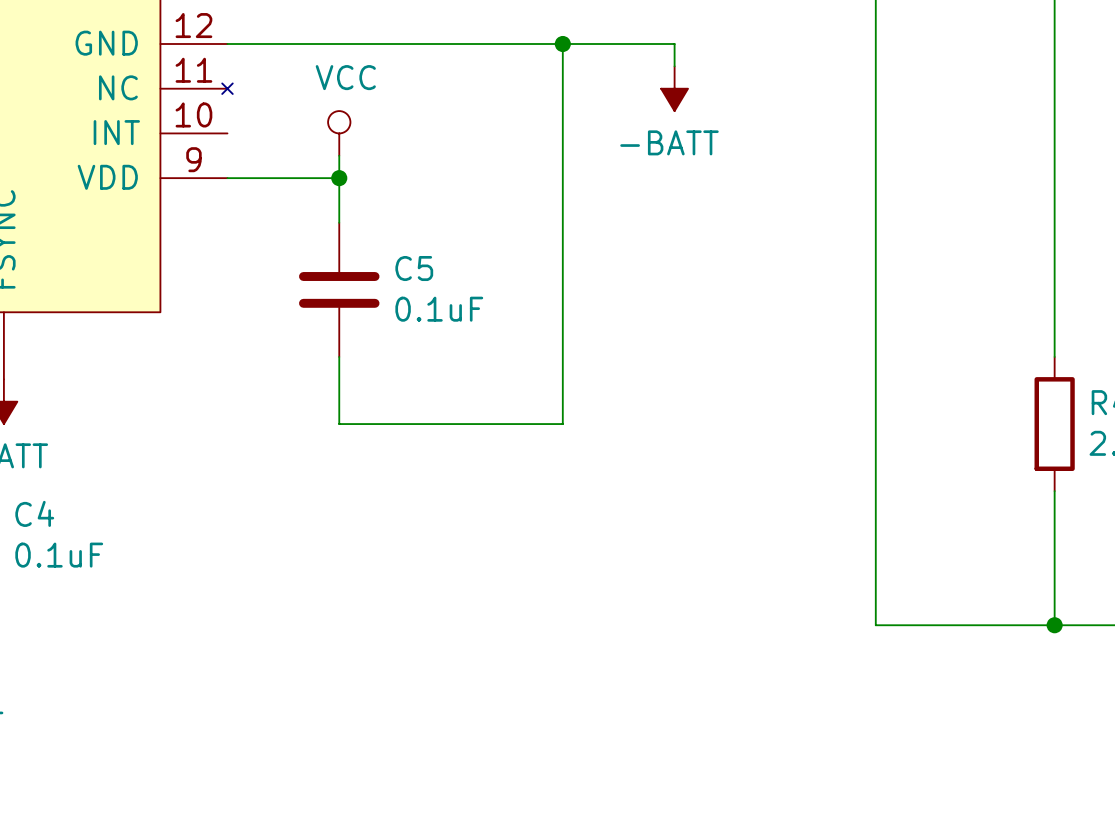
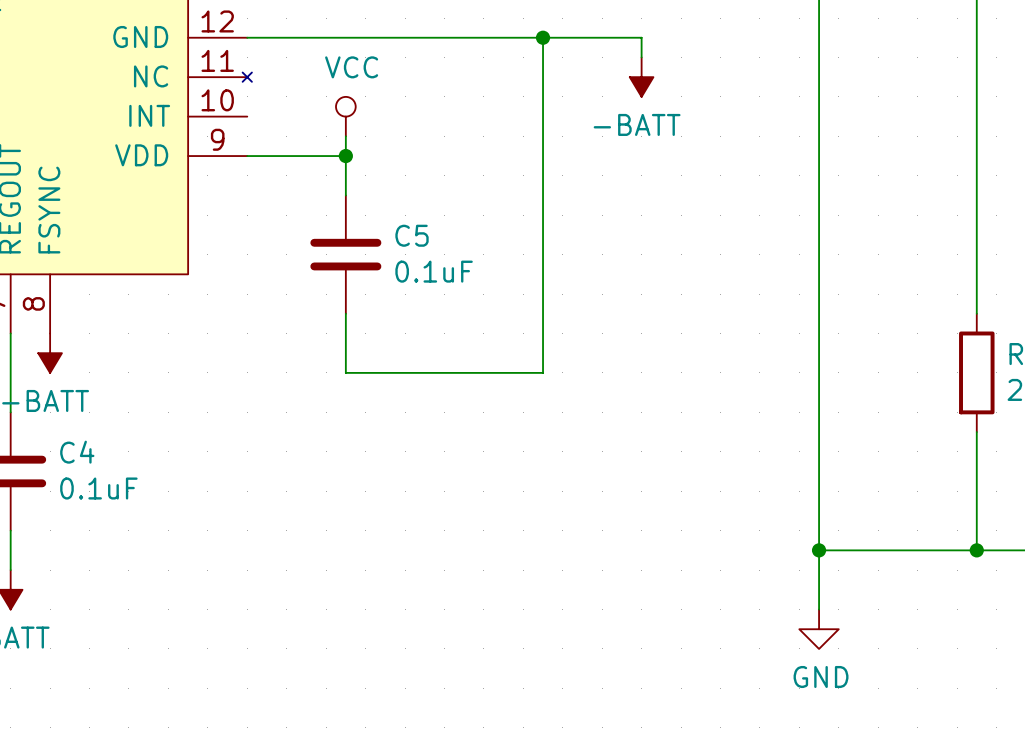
wire: none -> (819, 550) (819, 609)
junction: none -> (819, 550)
power symbol: none -> GND (819, 629)

